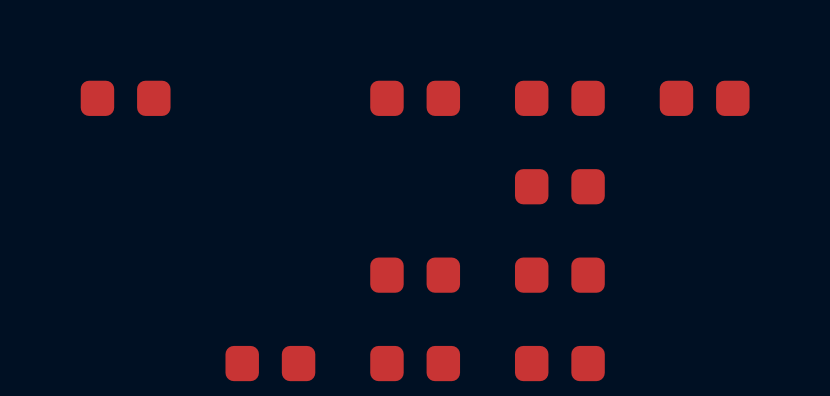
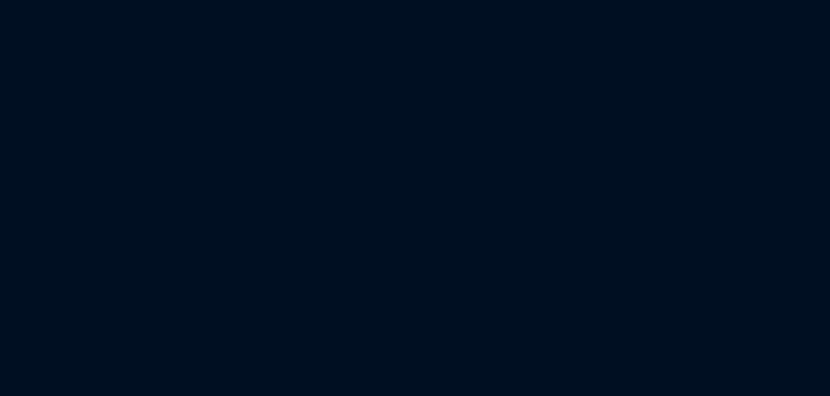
part: (125, 98) -> none
part: (415, 98) -> none
part: (559, 98) -> none
part: (704, 98) -> none
part: (559, 186) -> none
part: (415, 275) -> none
part: (559, 275) -> none
part: (270, 363) -> none
part: (415, 363) -> none
part: (559, 363) -> none

